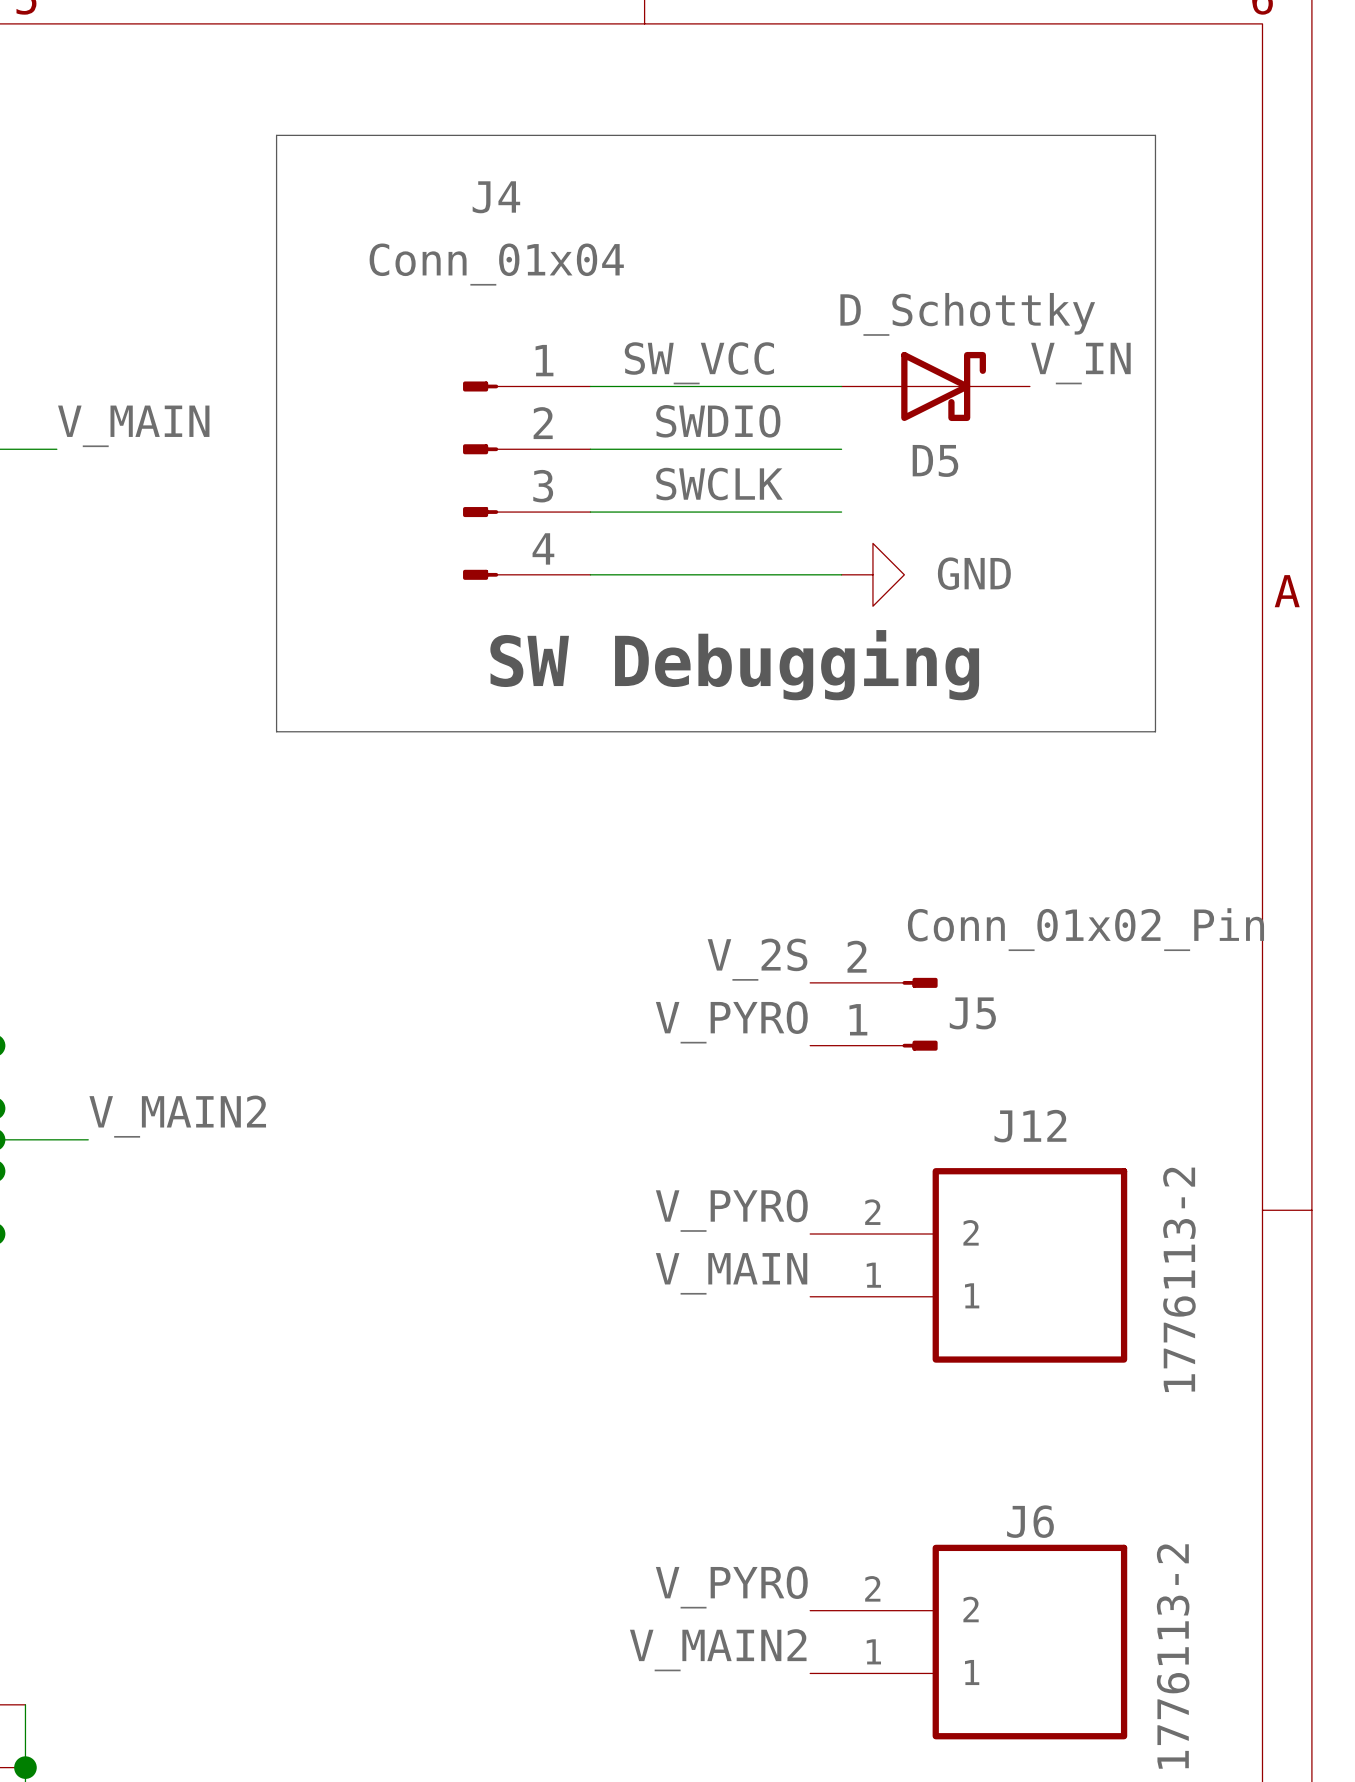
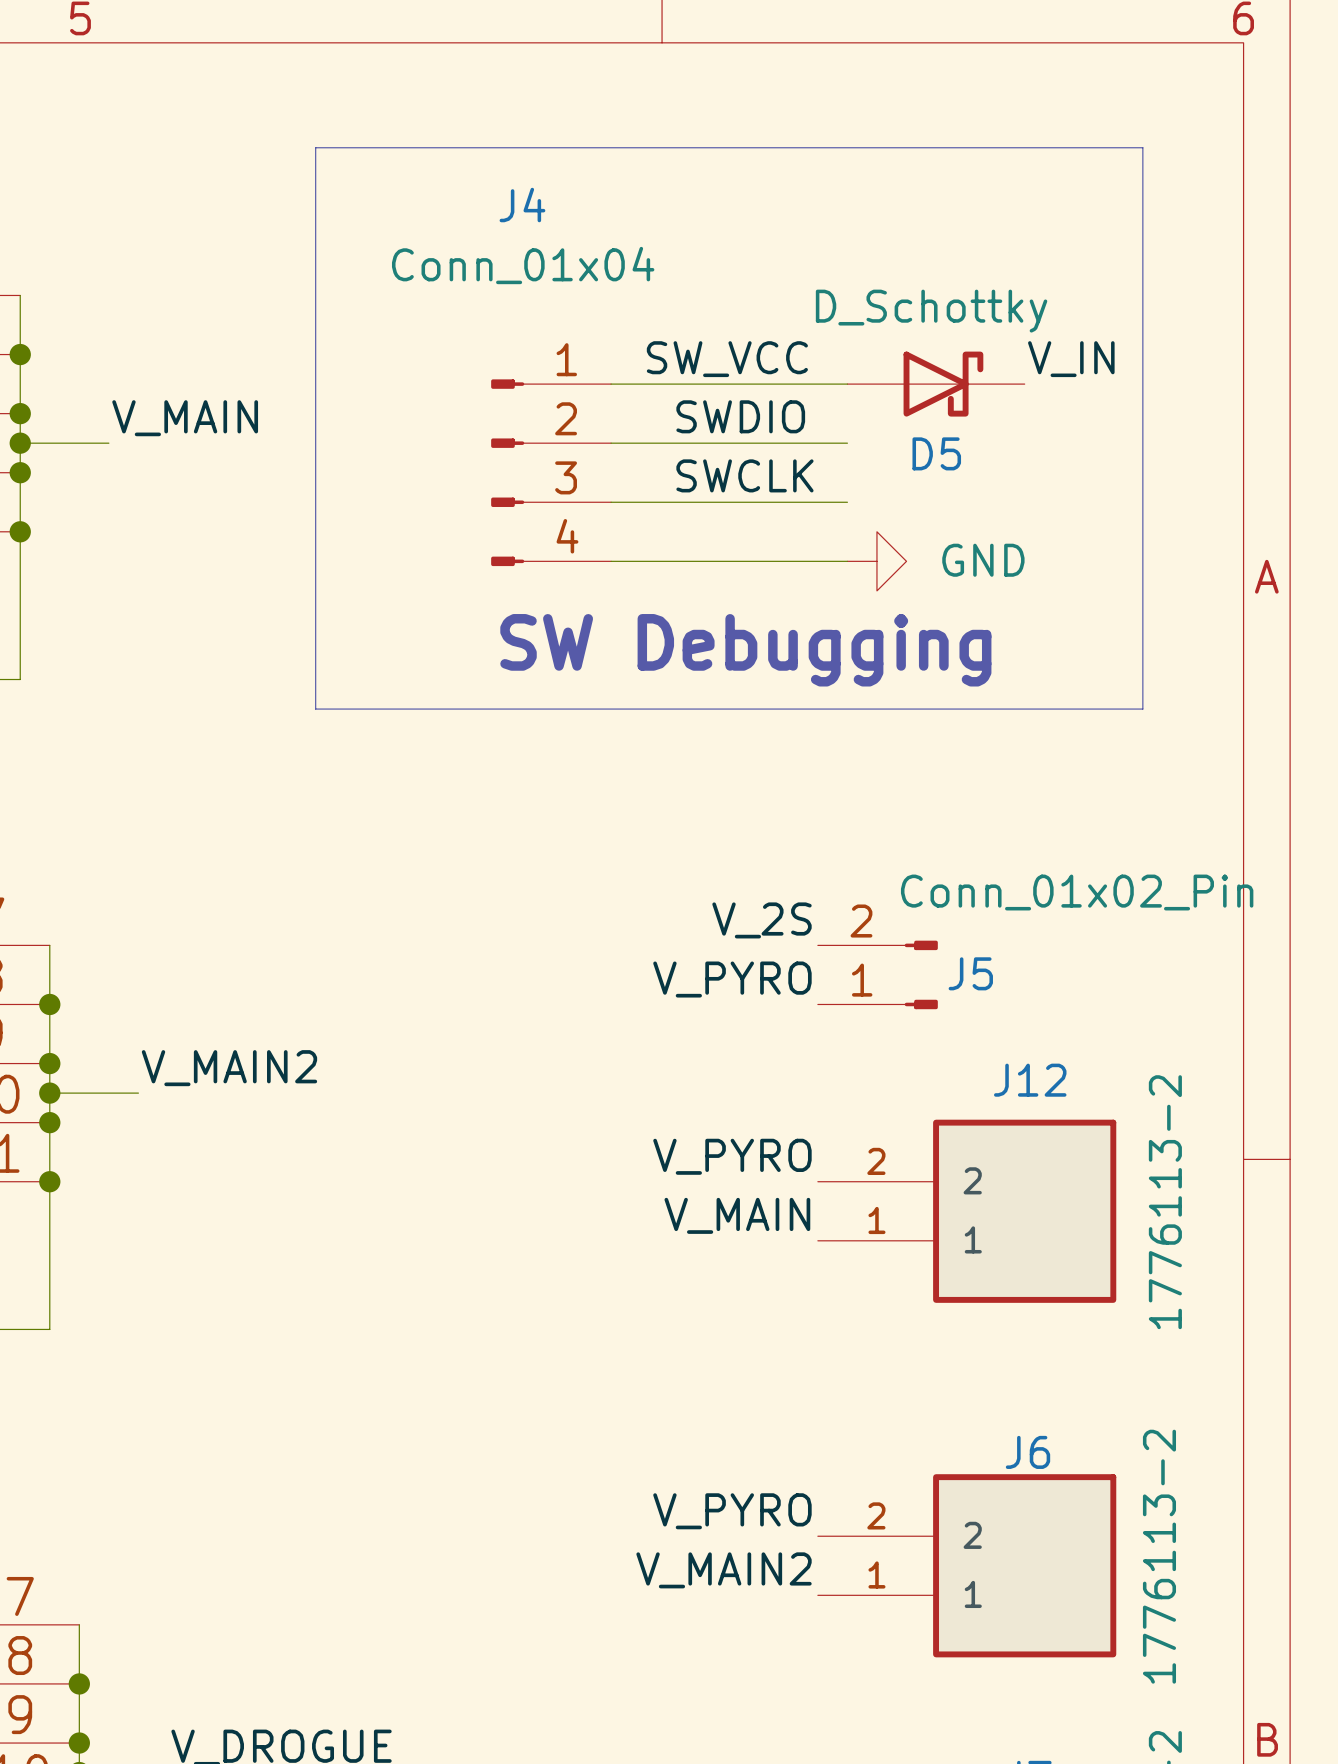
D5 value position: D_Schottky (967, 314) -> D_Schottky (931, 311)

